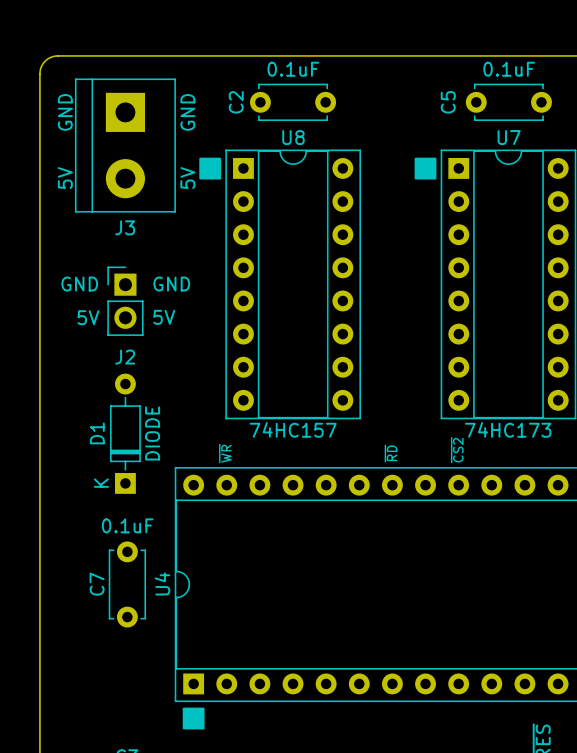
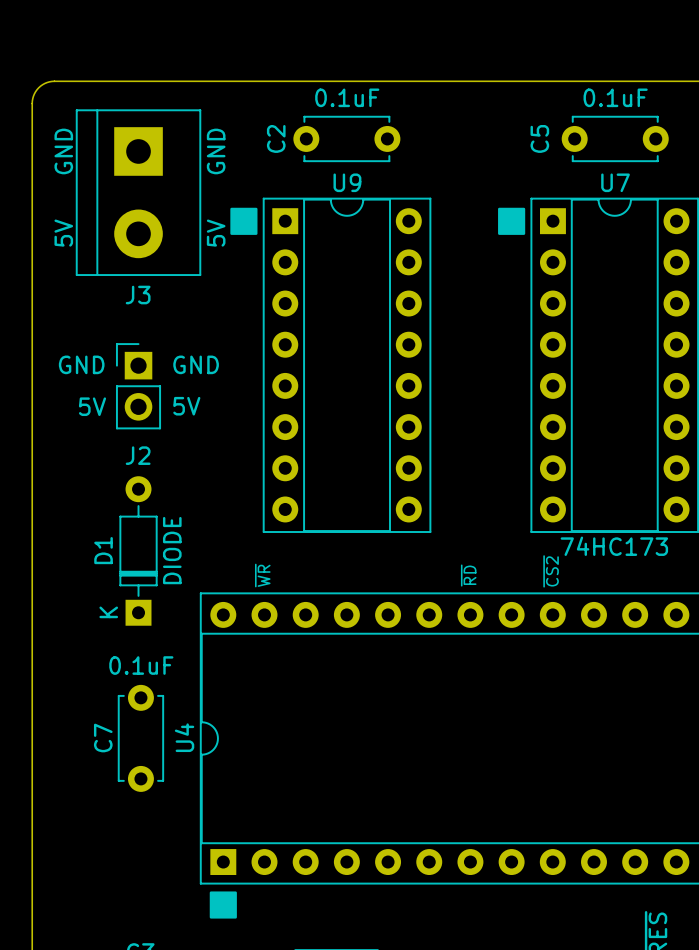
U8 name: U8 (293, 137) -> U9 (347, 182)
U8 value: 74HC157 (293, 429) -> none

